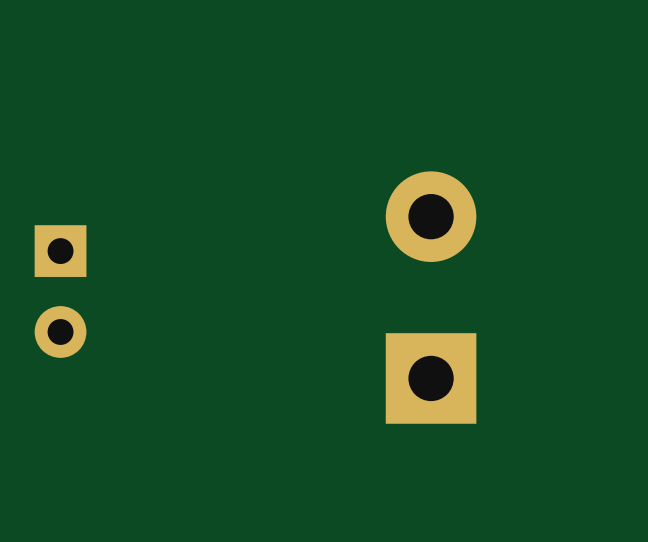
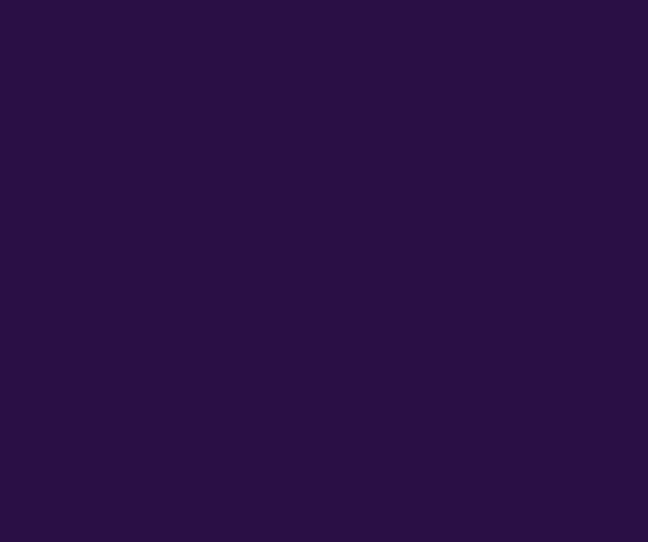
part: (60, 291) -> none
part: (431, 297) -> none

